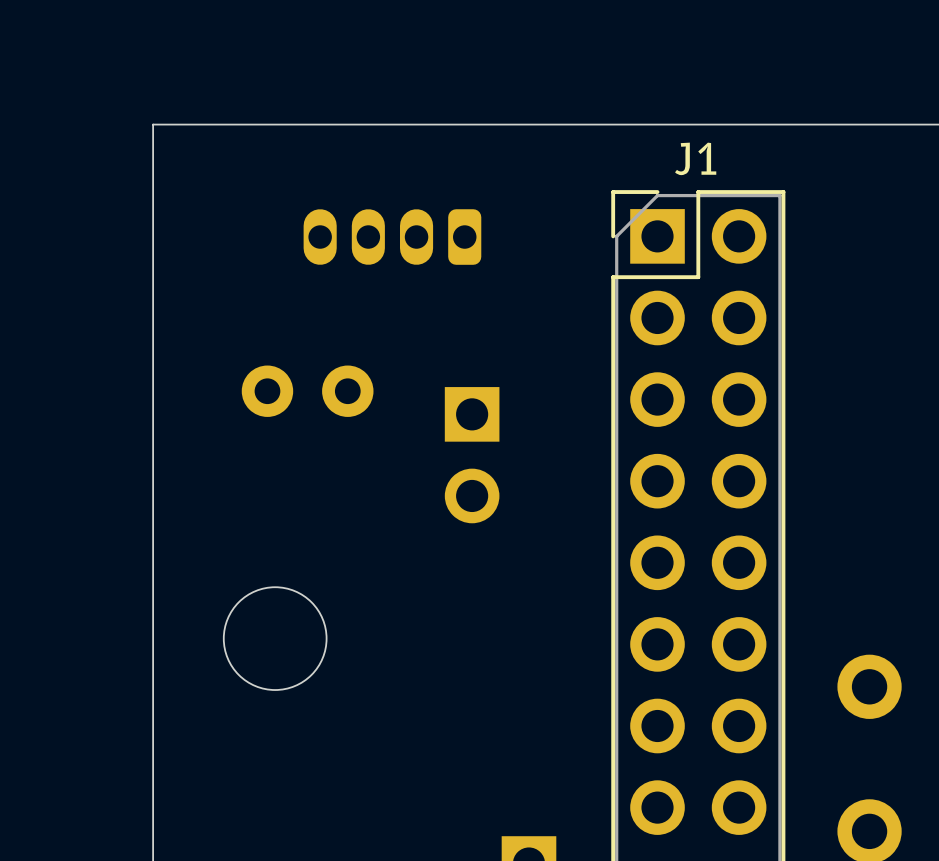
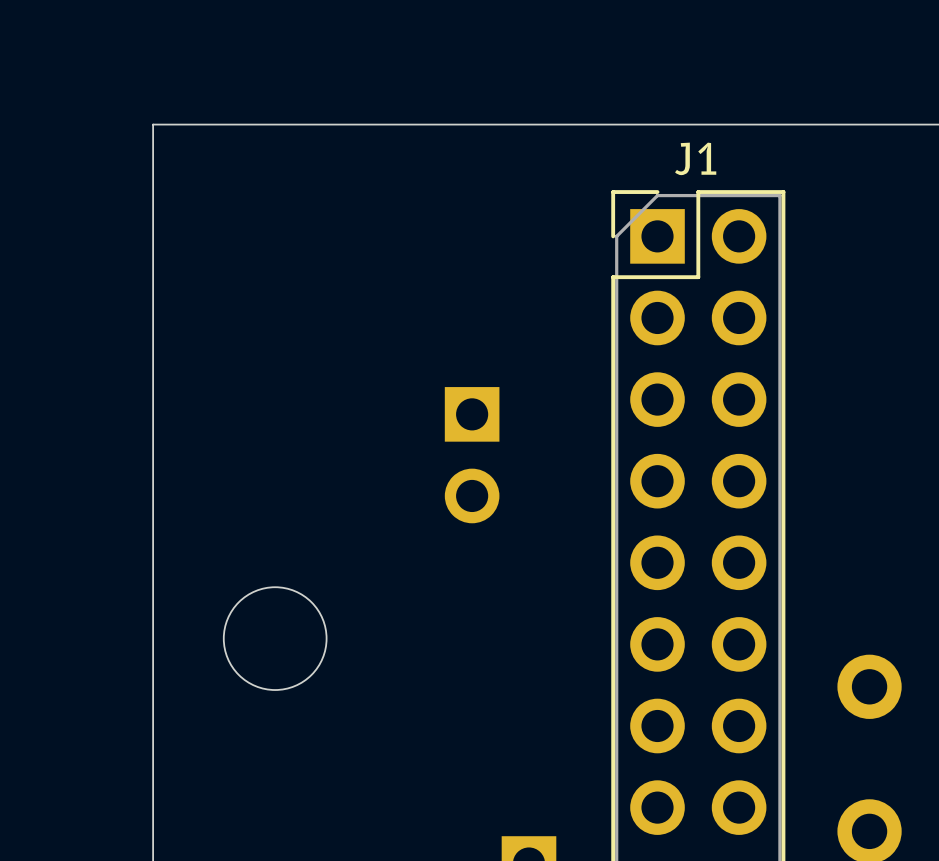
part: (392, 237) -> none
part: (307, 391) -> none

